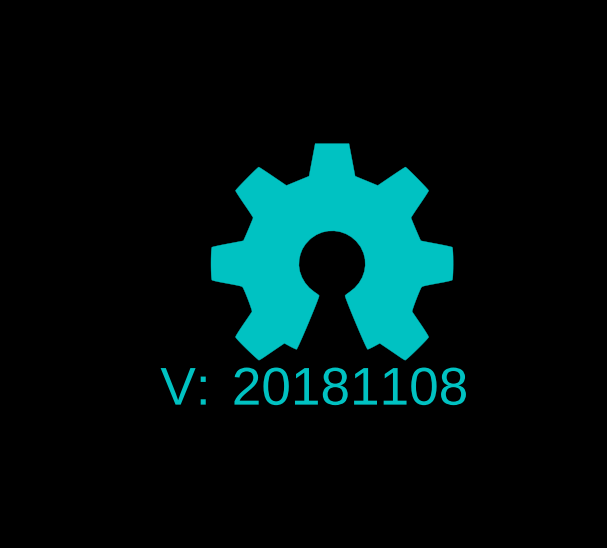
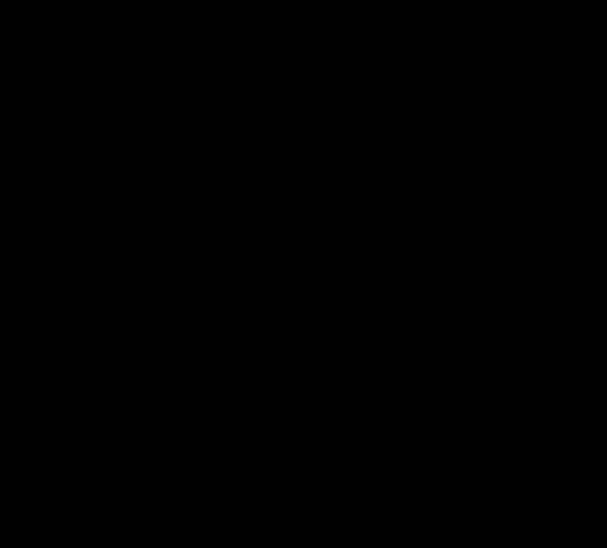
drawing: [210, 143, 454, 361] -> none

